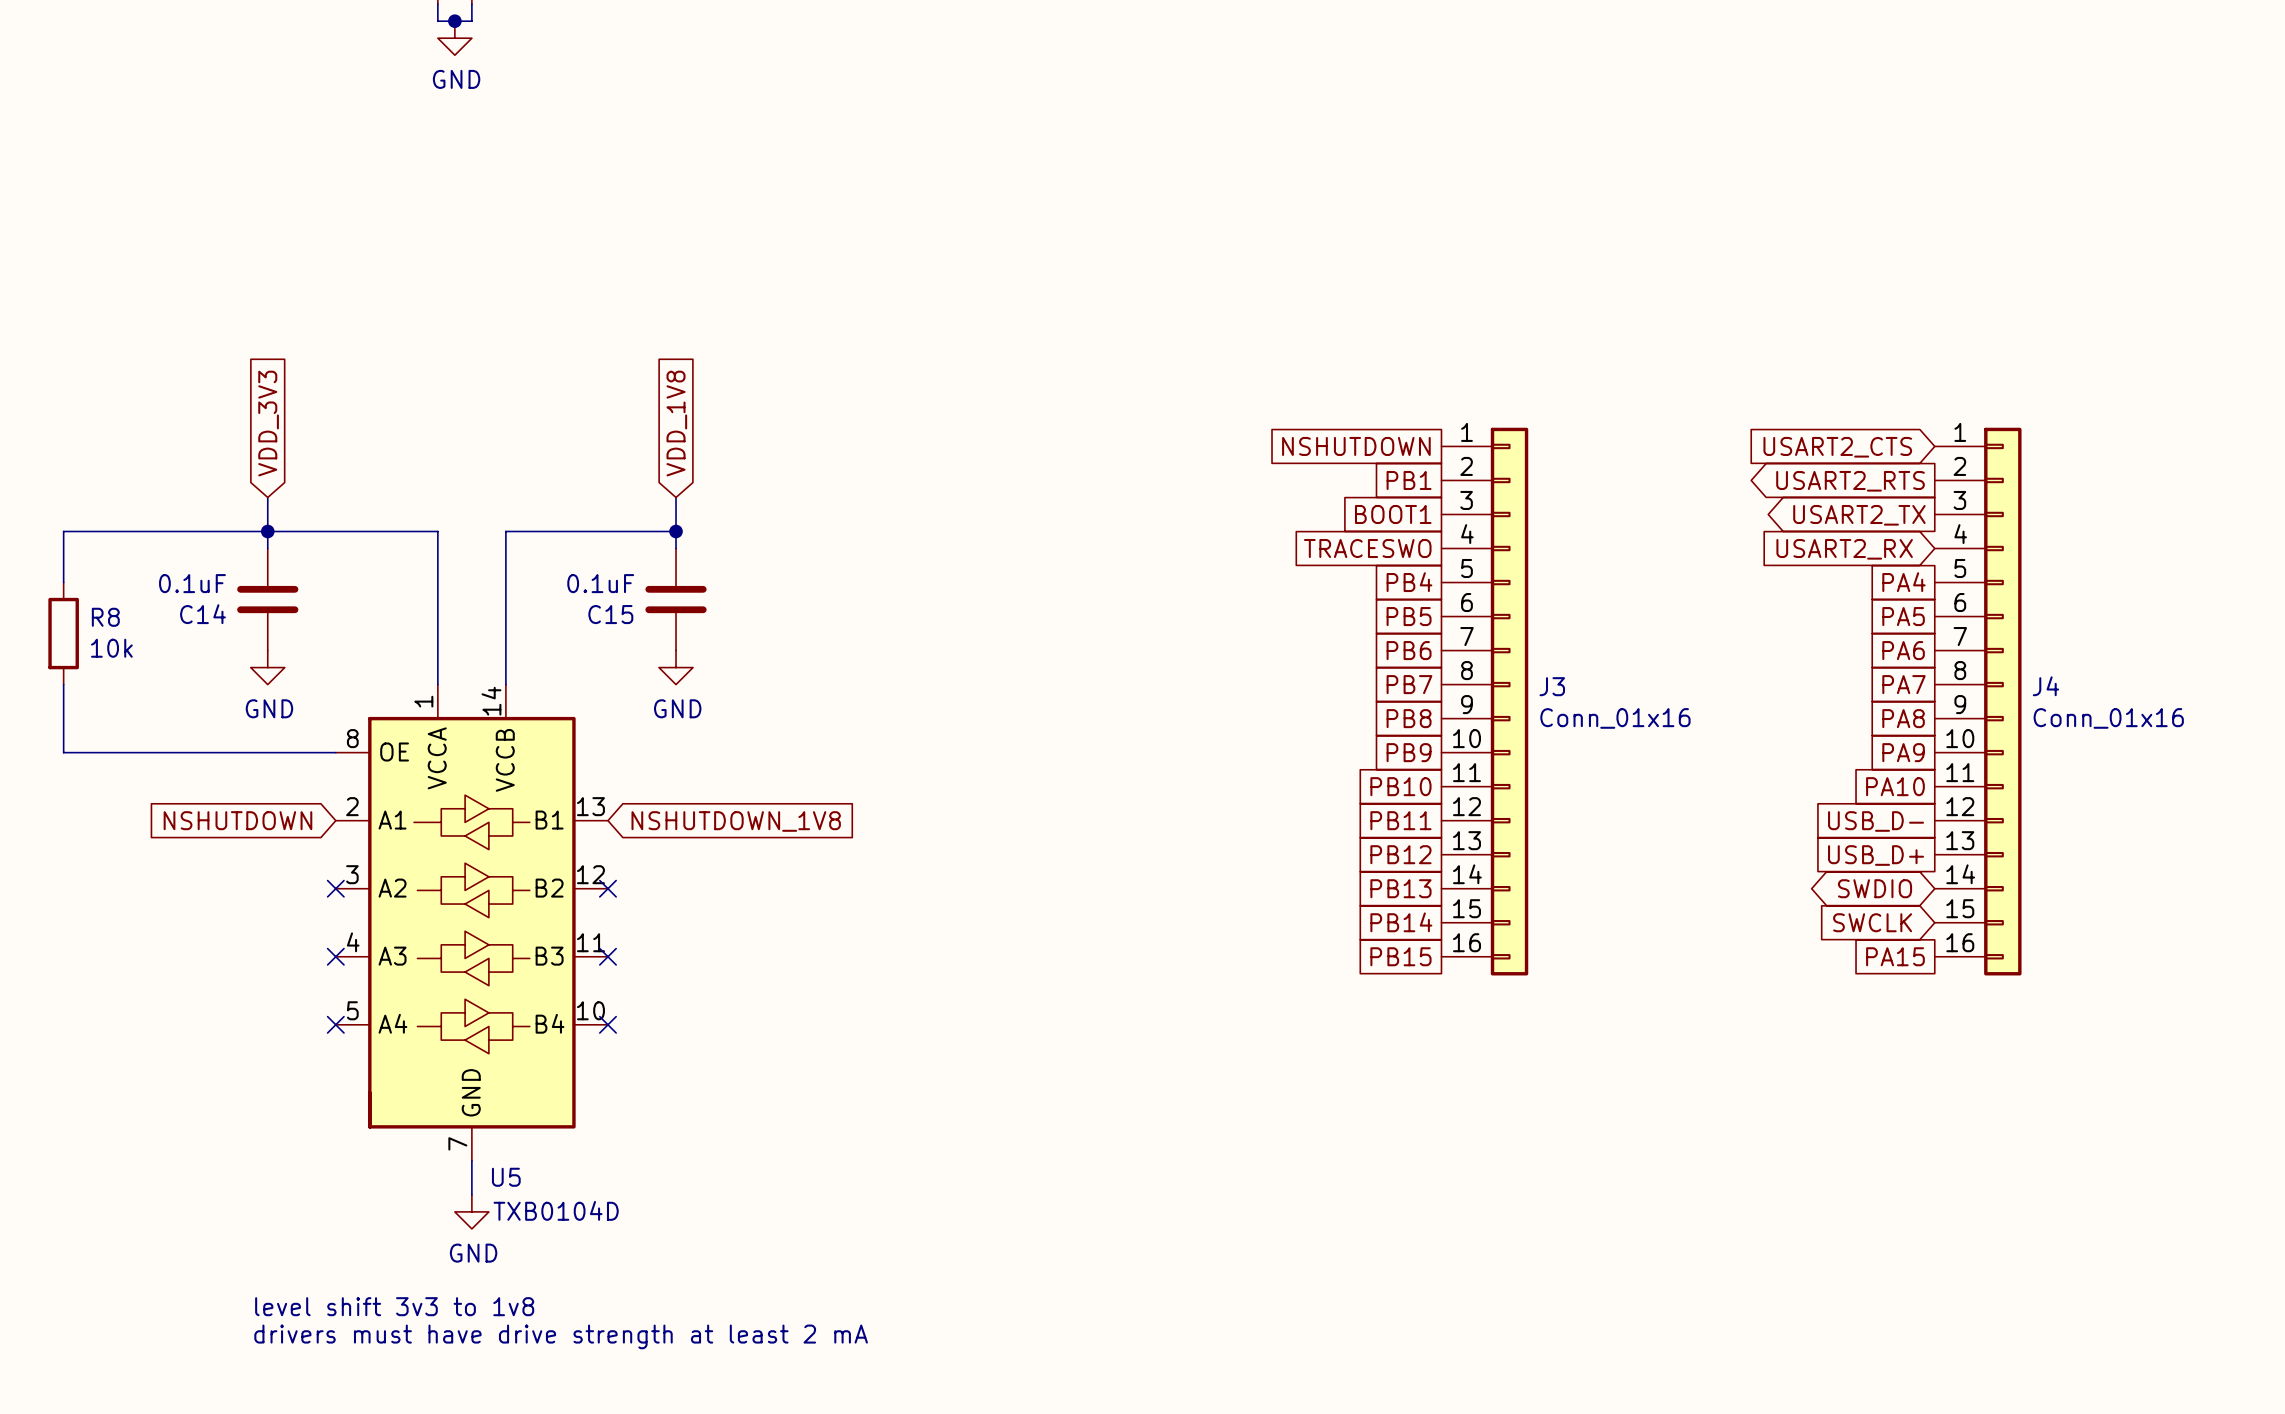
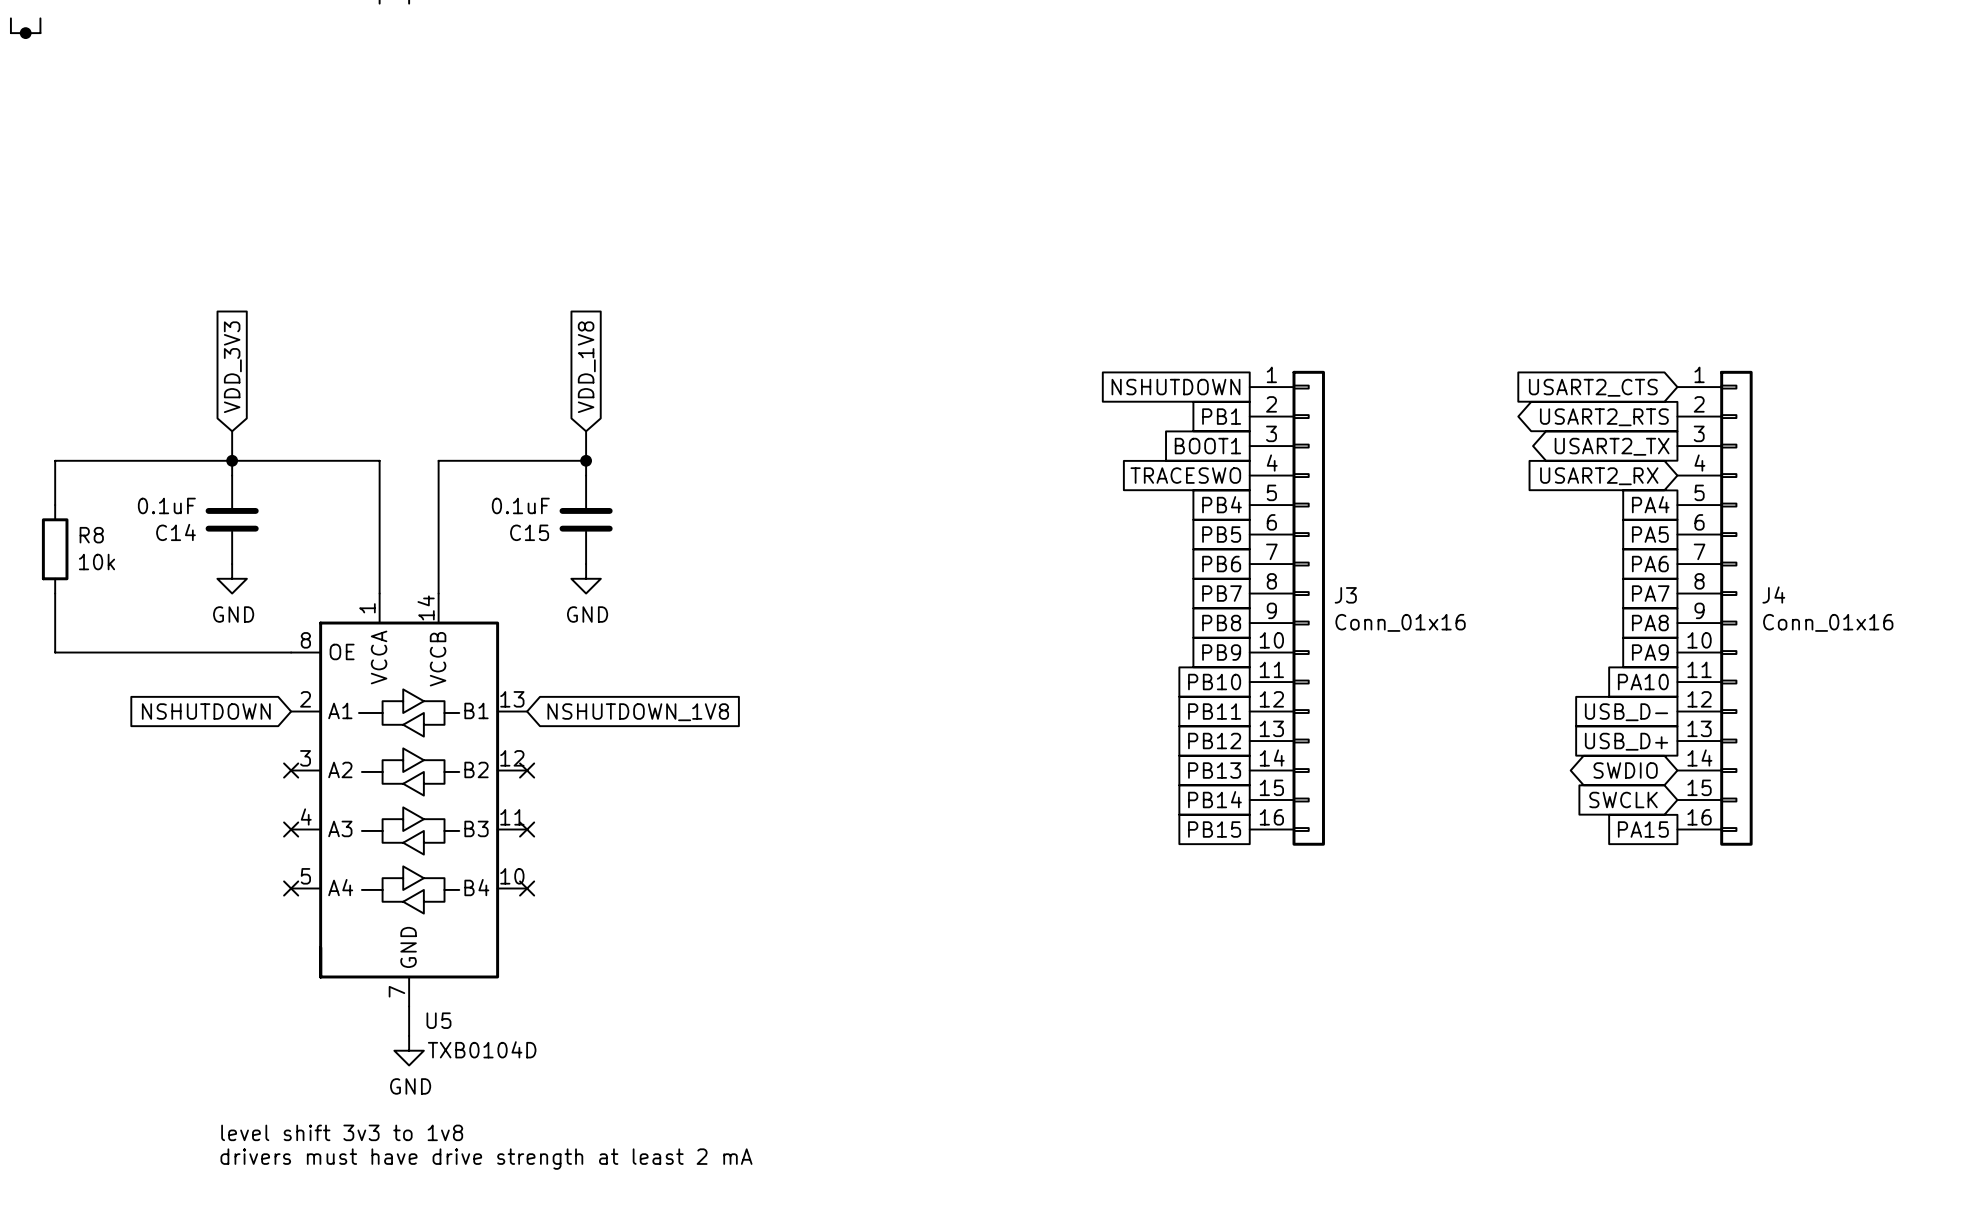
wire: (437, 4) (437, 21) (471, 21) (471, 4) -> none
wire: none -> (10, 18) (10, 33) (40, 33) (40, 18)
junction: (454, 21) -> none
junction: none -> (25, 33)
power symbol: GND (454, 38) -> none

